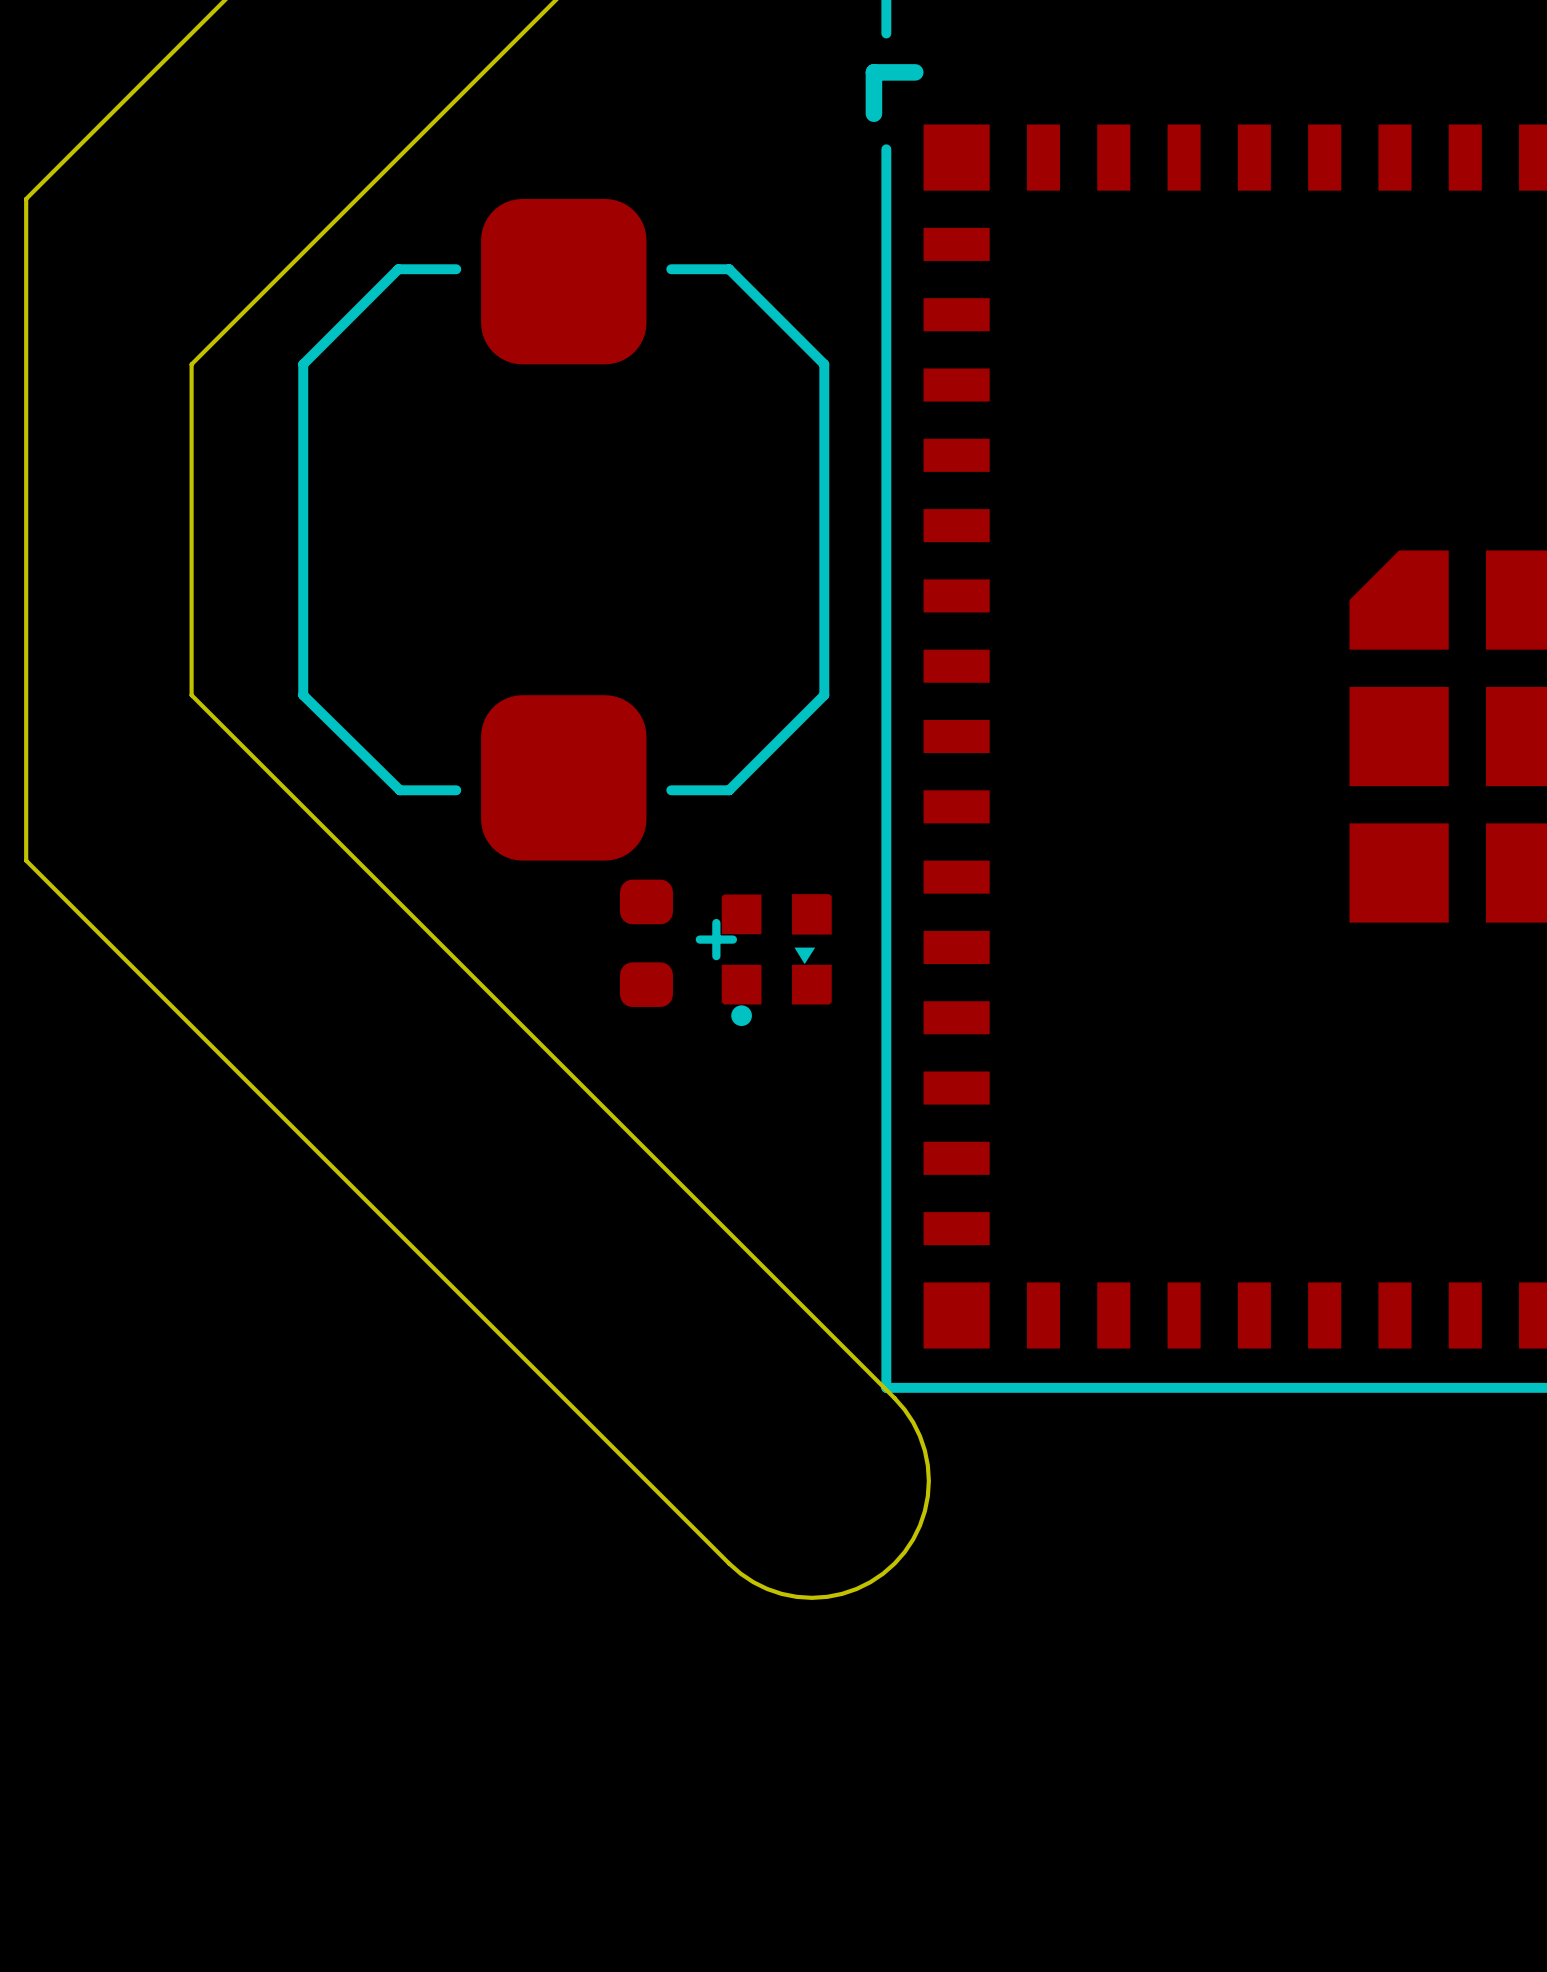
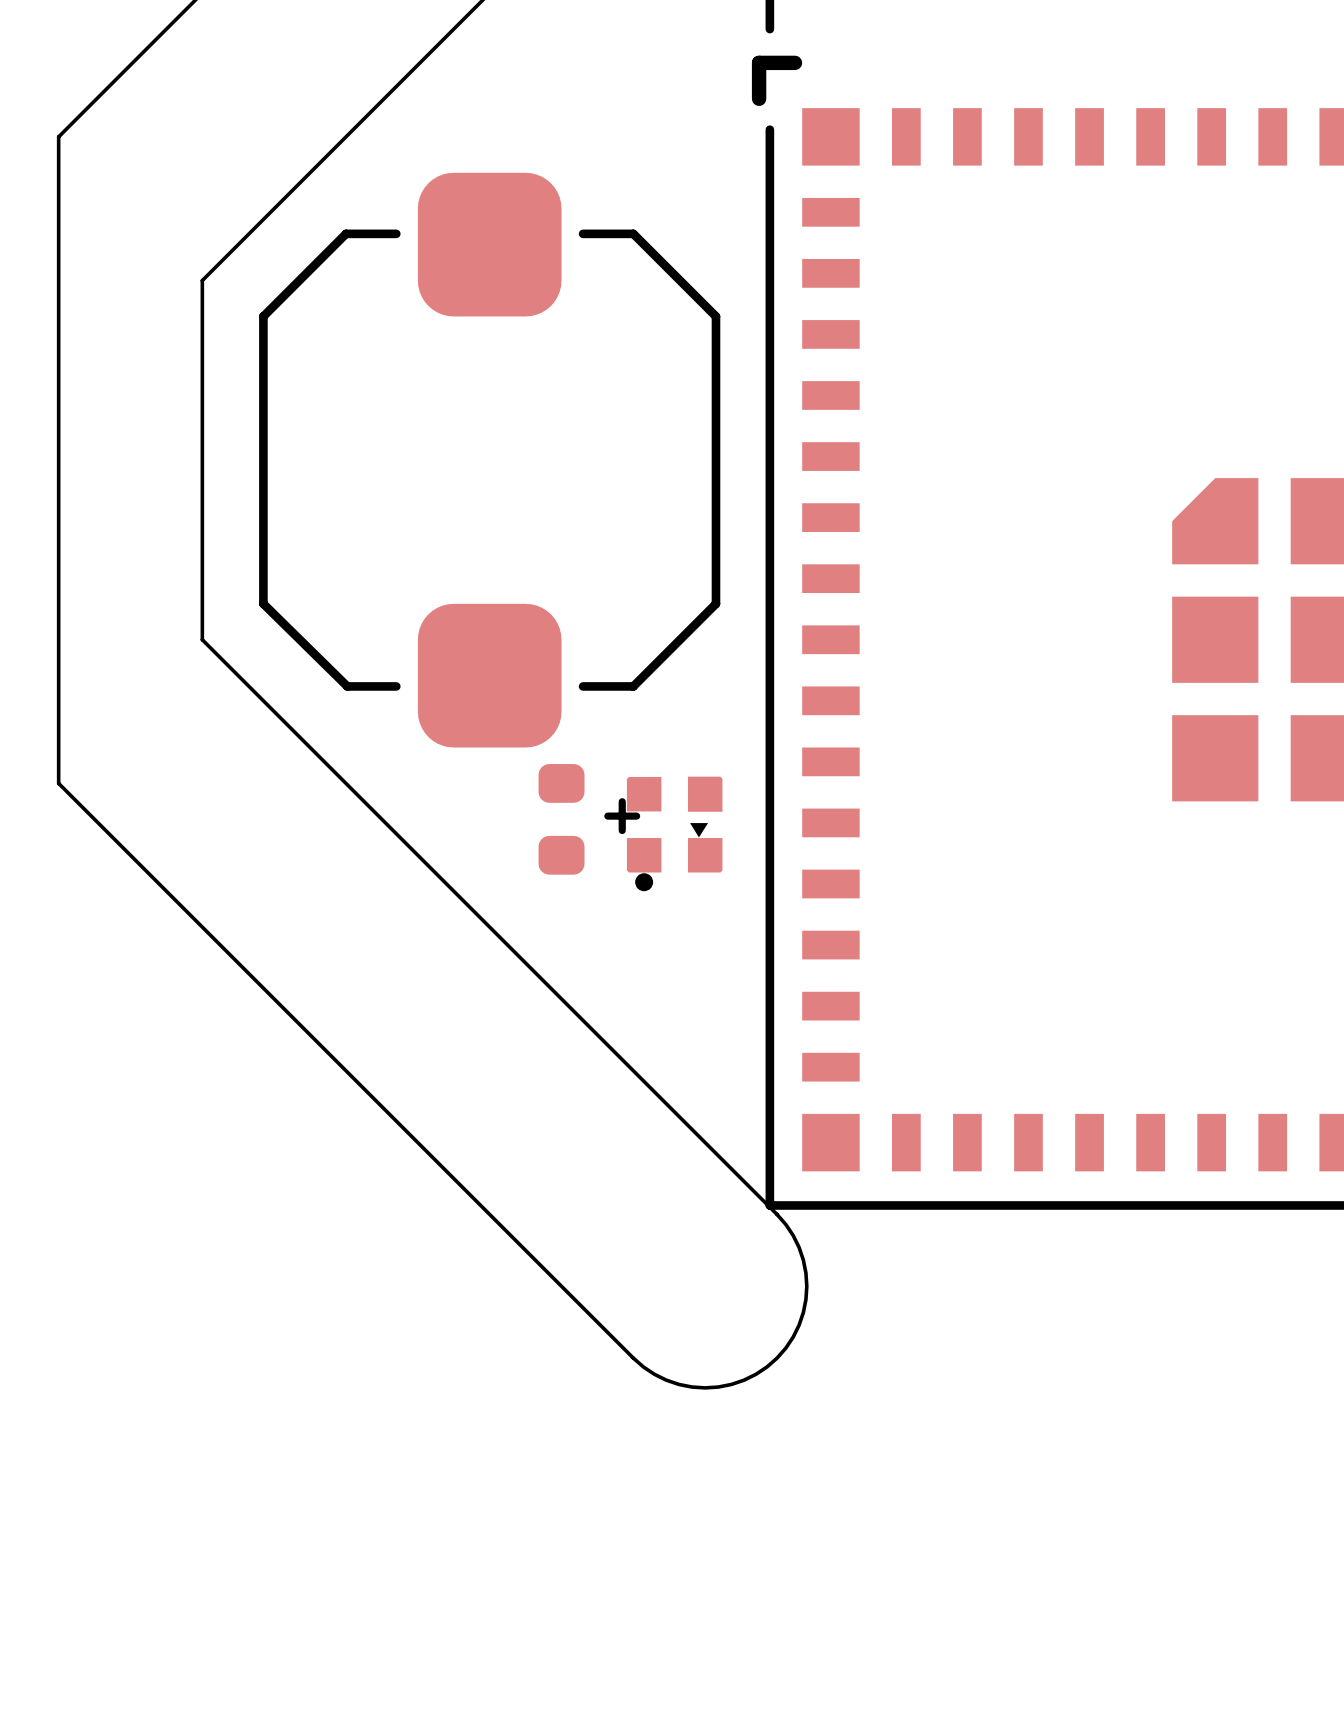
board edge: (67, 157) (26, 198) (26, 860) (67, 901) -> (58, 136) (58, 783)
board edge: (232, 323) (191, 364) (191, 695) (232, 736) -> (202, 280) (202, 639)

